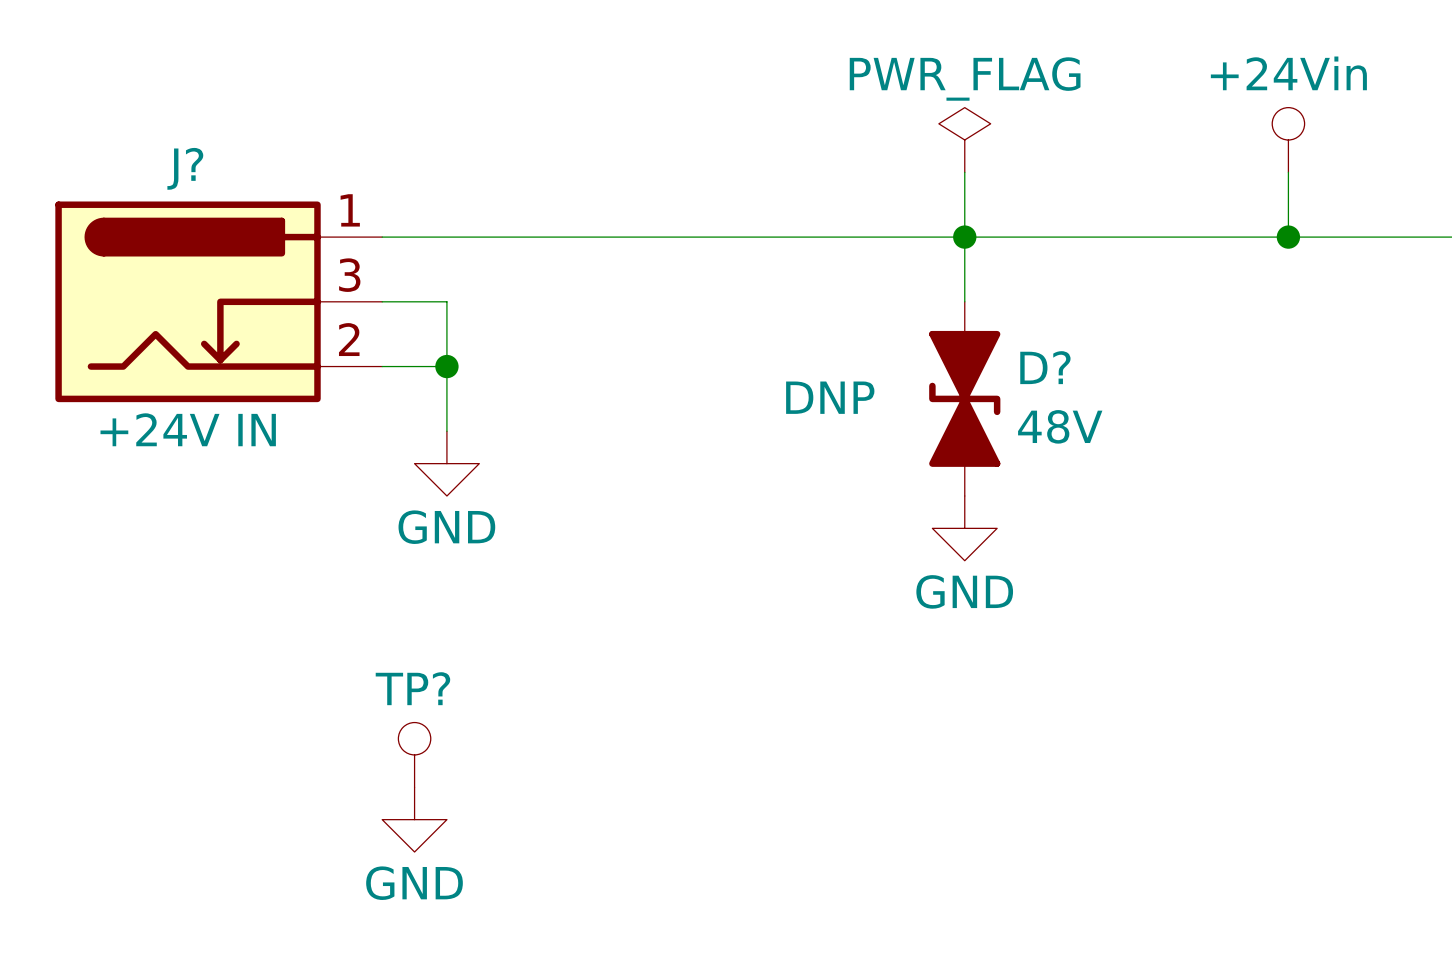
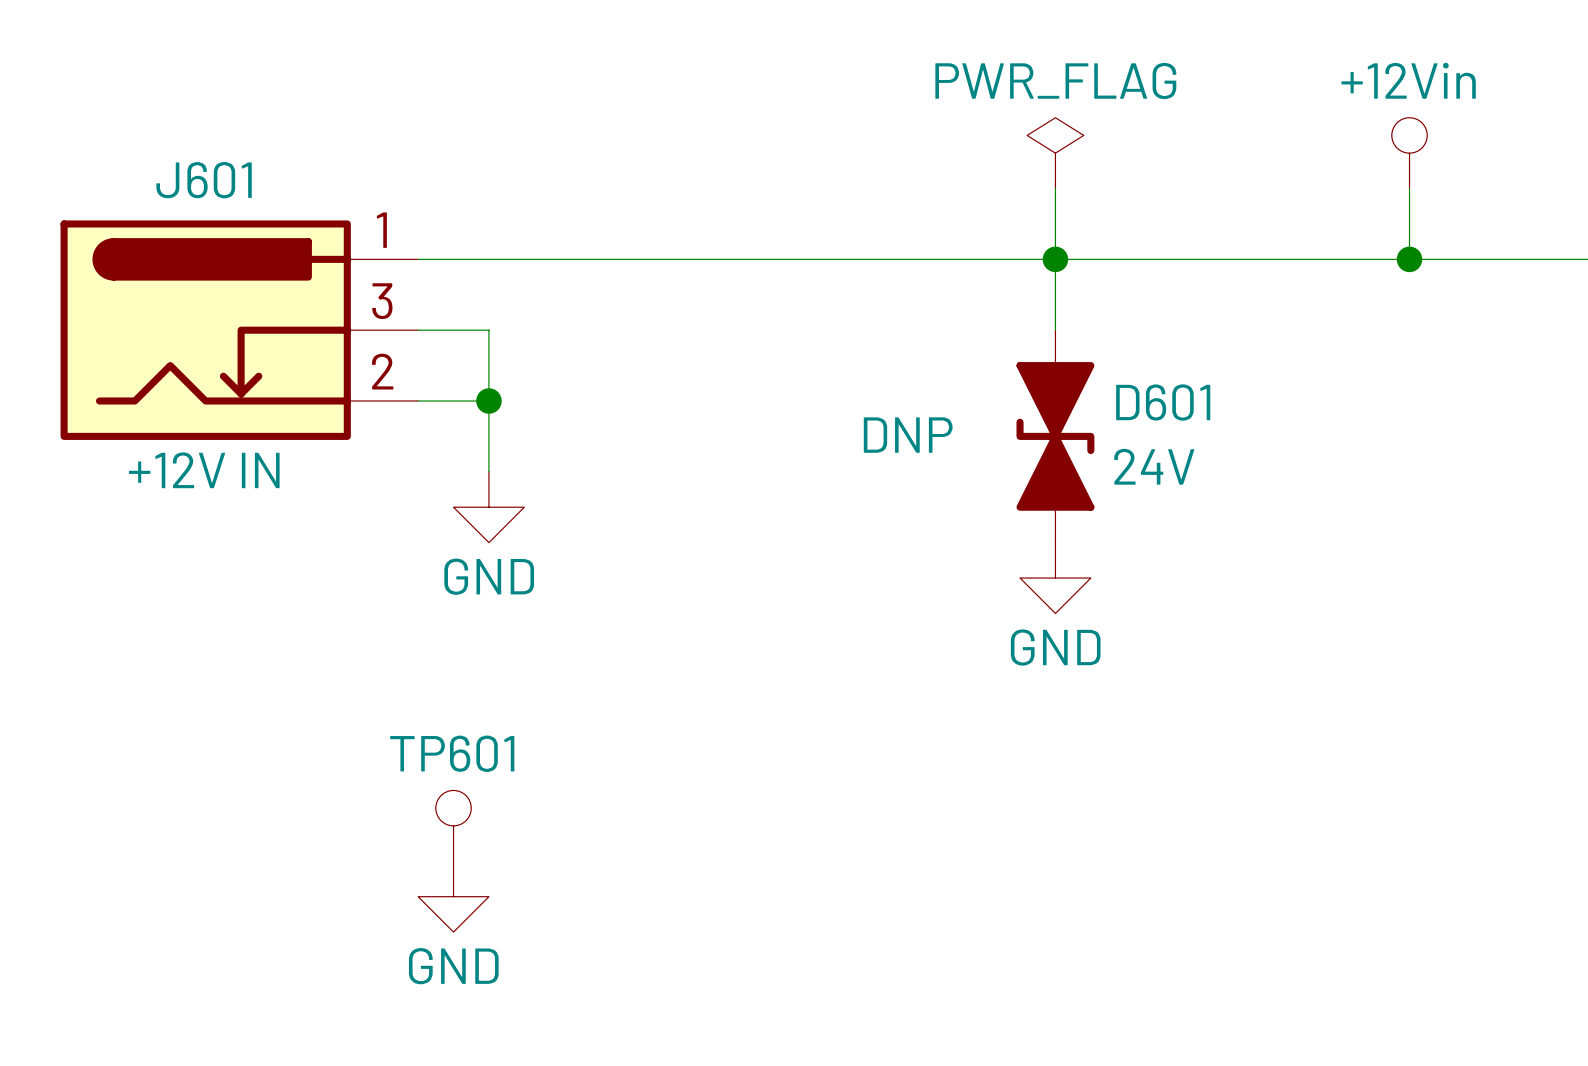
power symbol: +24Vin (1288, 139) -> +12Vin (1409, 153)
J? name: J? (185, 168) -> J601 (204, 180)
D? name: D? (1045, 367) -> D601 (1163, 402)
D? value: 48V (1060, 426) -> 24V (1154, 466)
J? value: +24V IN (188, 429) -> +12V IN (204, 470)
TP? name: TP? (412, 688) -> TP601 (452, 753)

